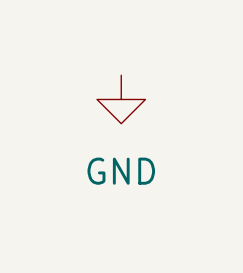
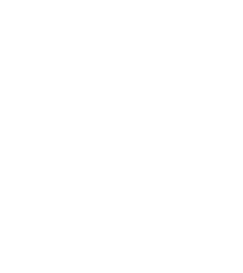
power symbol: GND (121, 99) -> none

